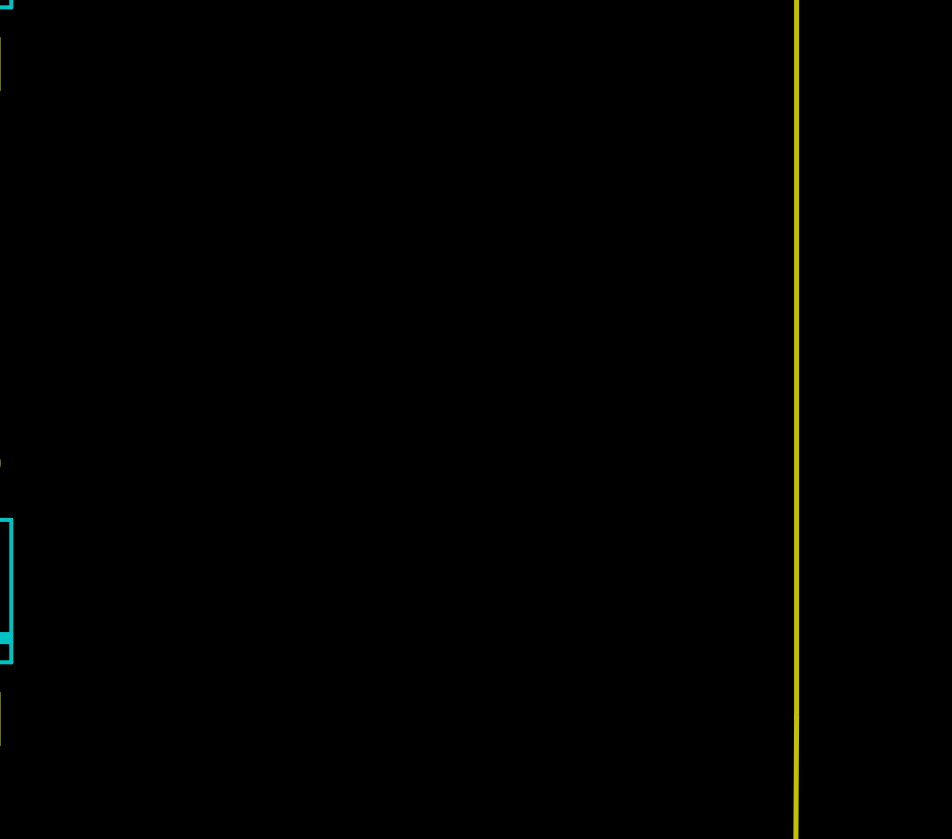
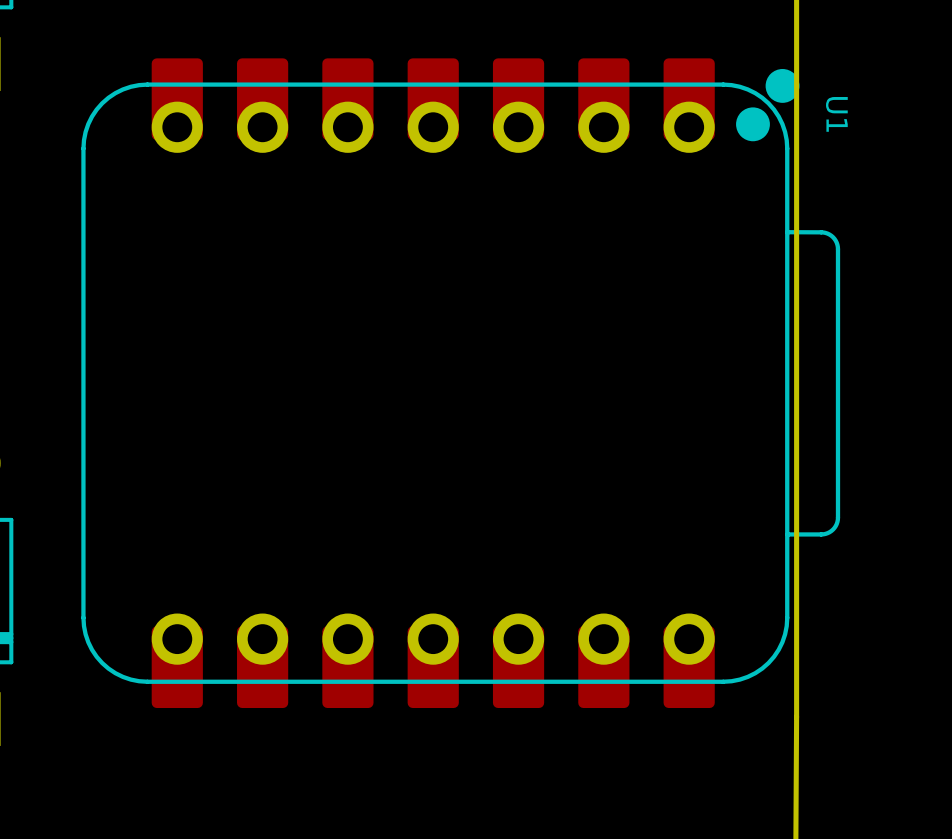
U1: none -> (460, 383)

